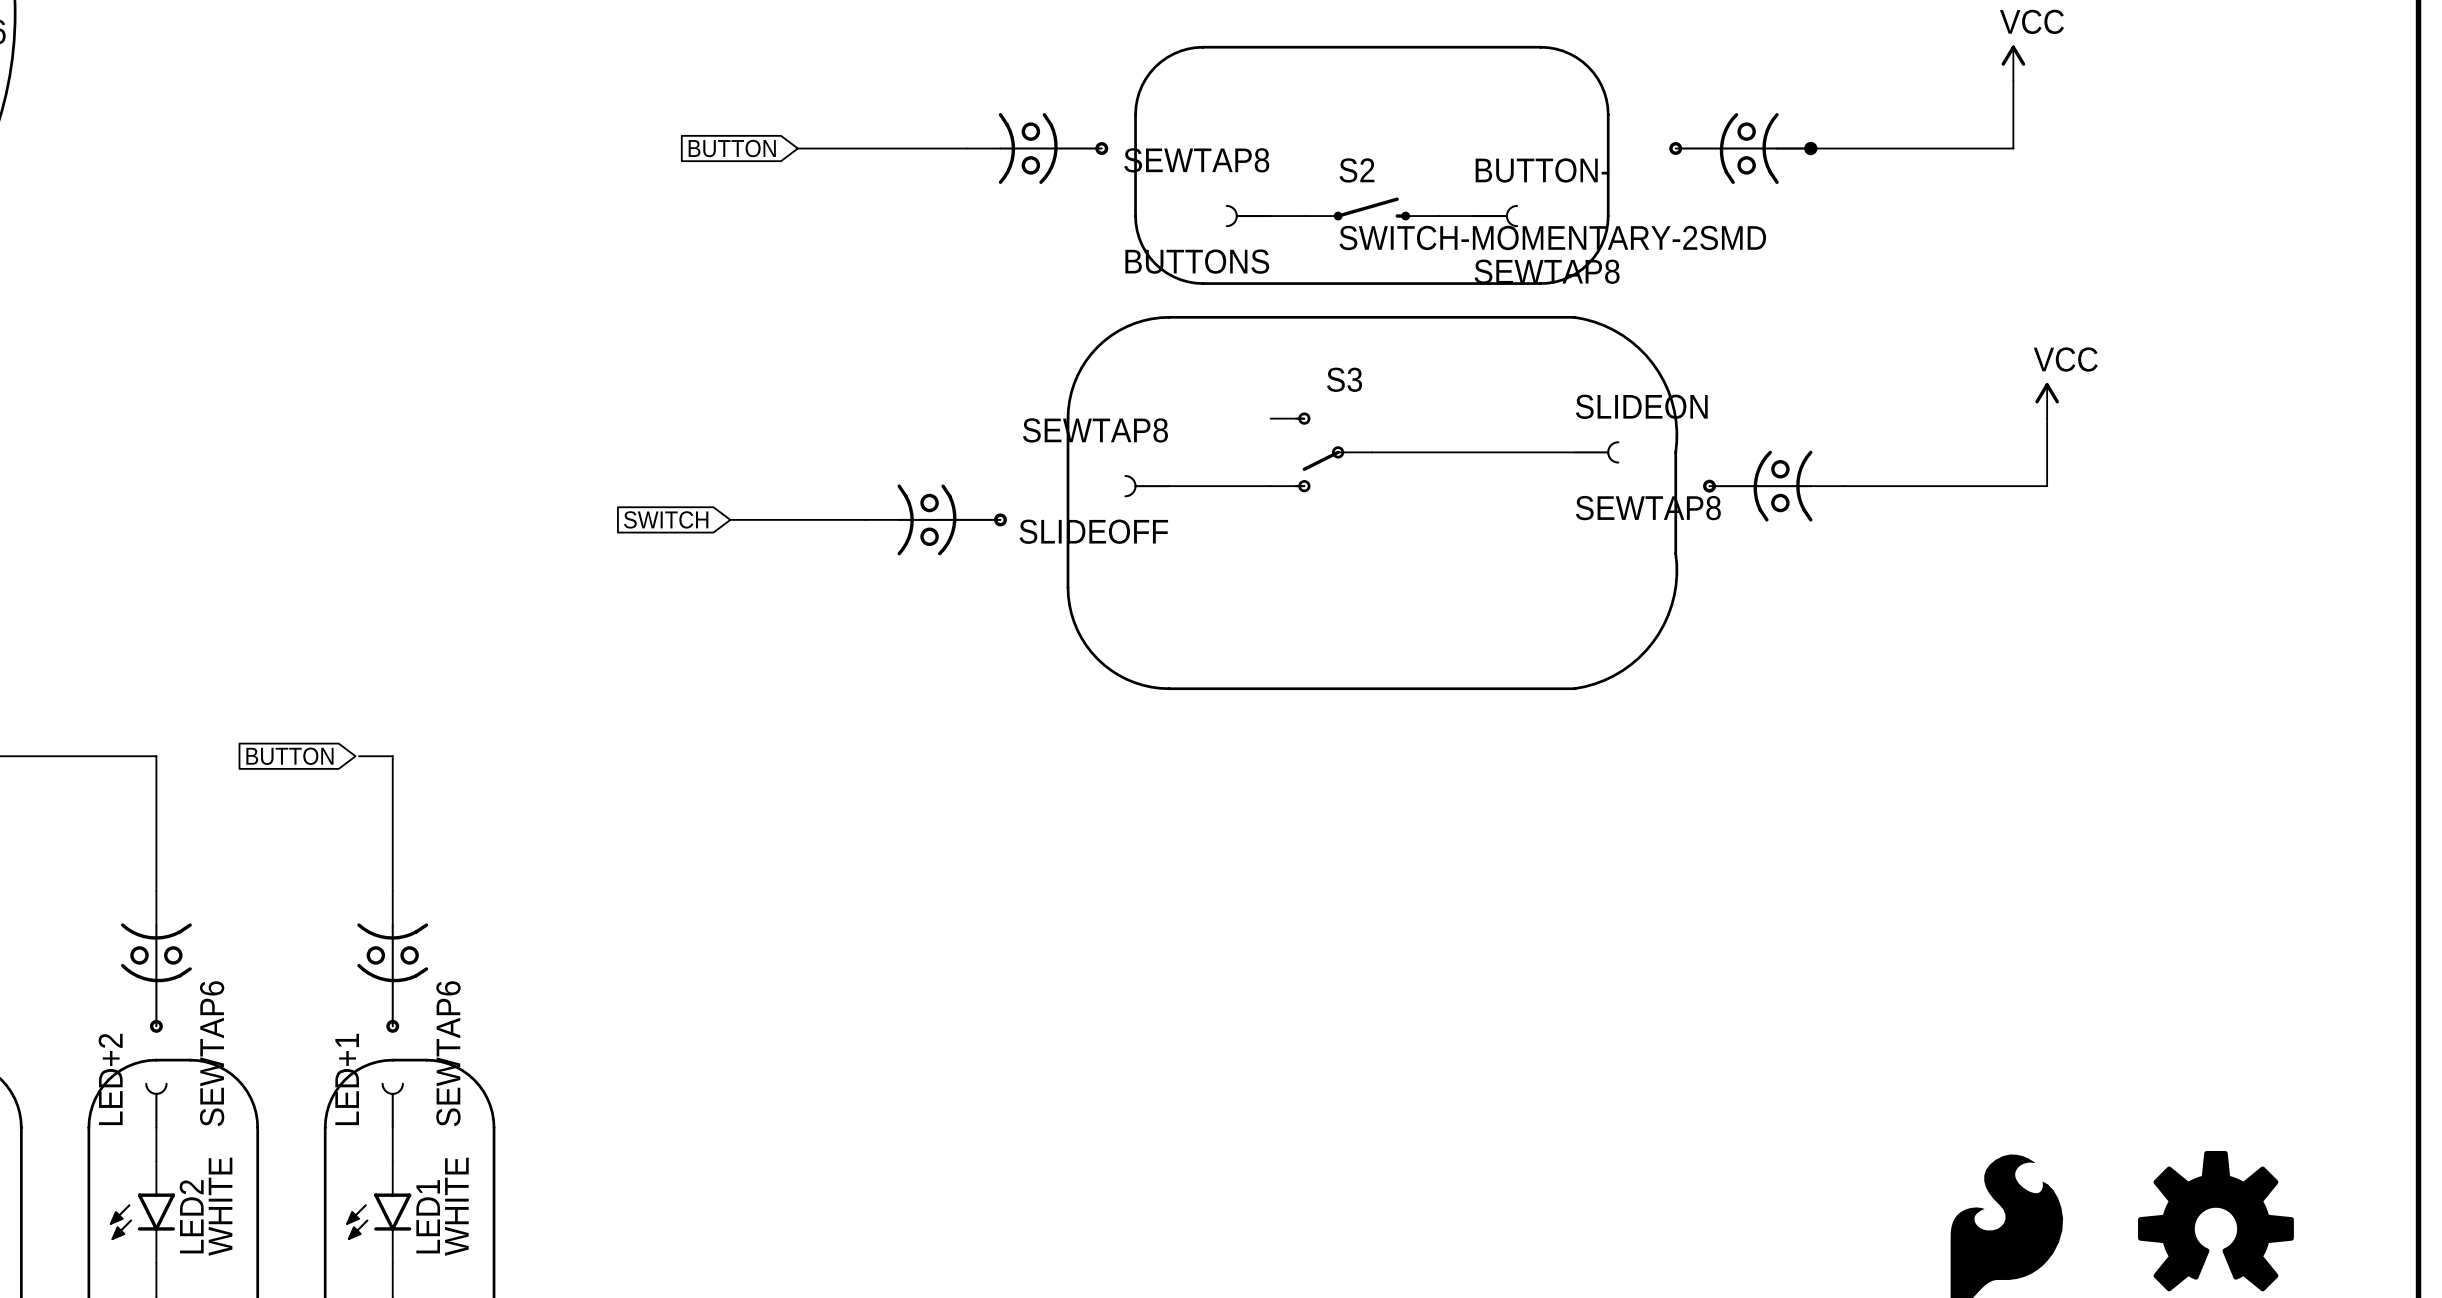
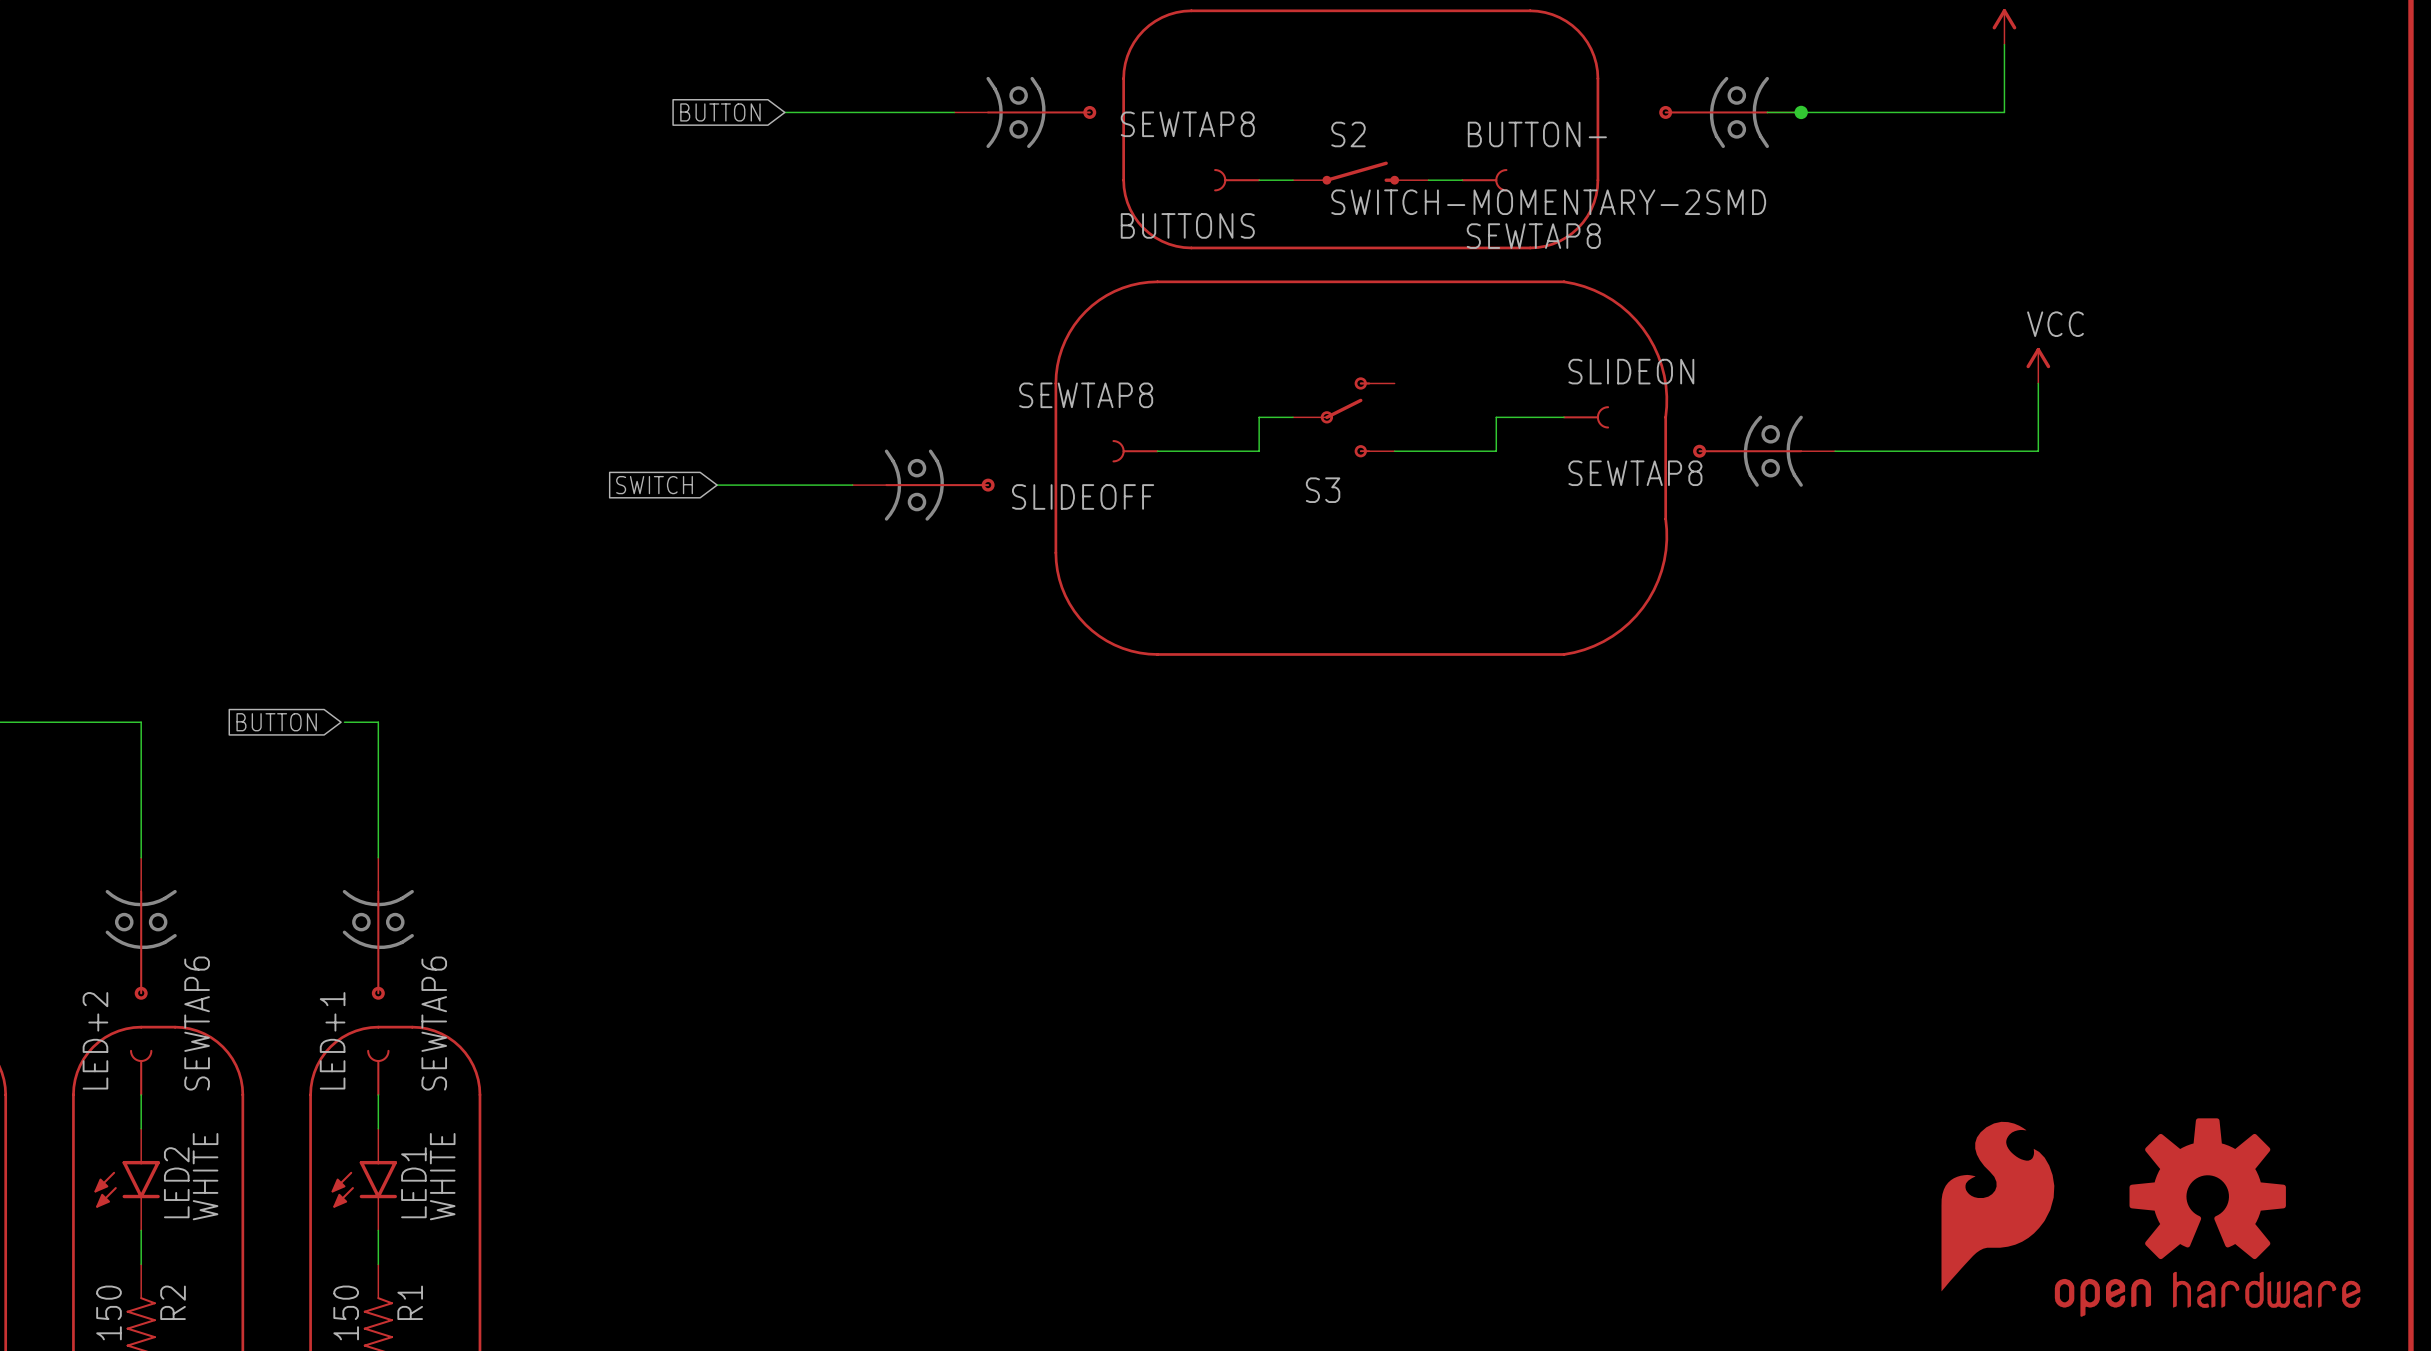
wire: none -> (1293, 417) (1259, 417) (1259, 451)
S3 rotation: 0° (1319, 452) -> 180° (1345, 417)
wire: (1371, 452) (1506, 452) -> (1394, 451) (1496, 451) (1496, 417)

